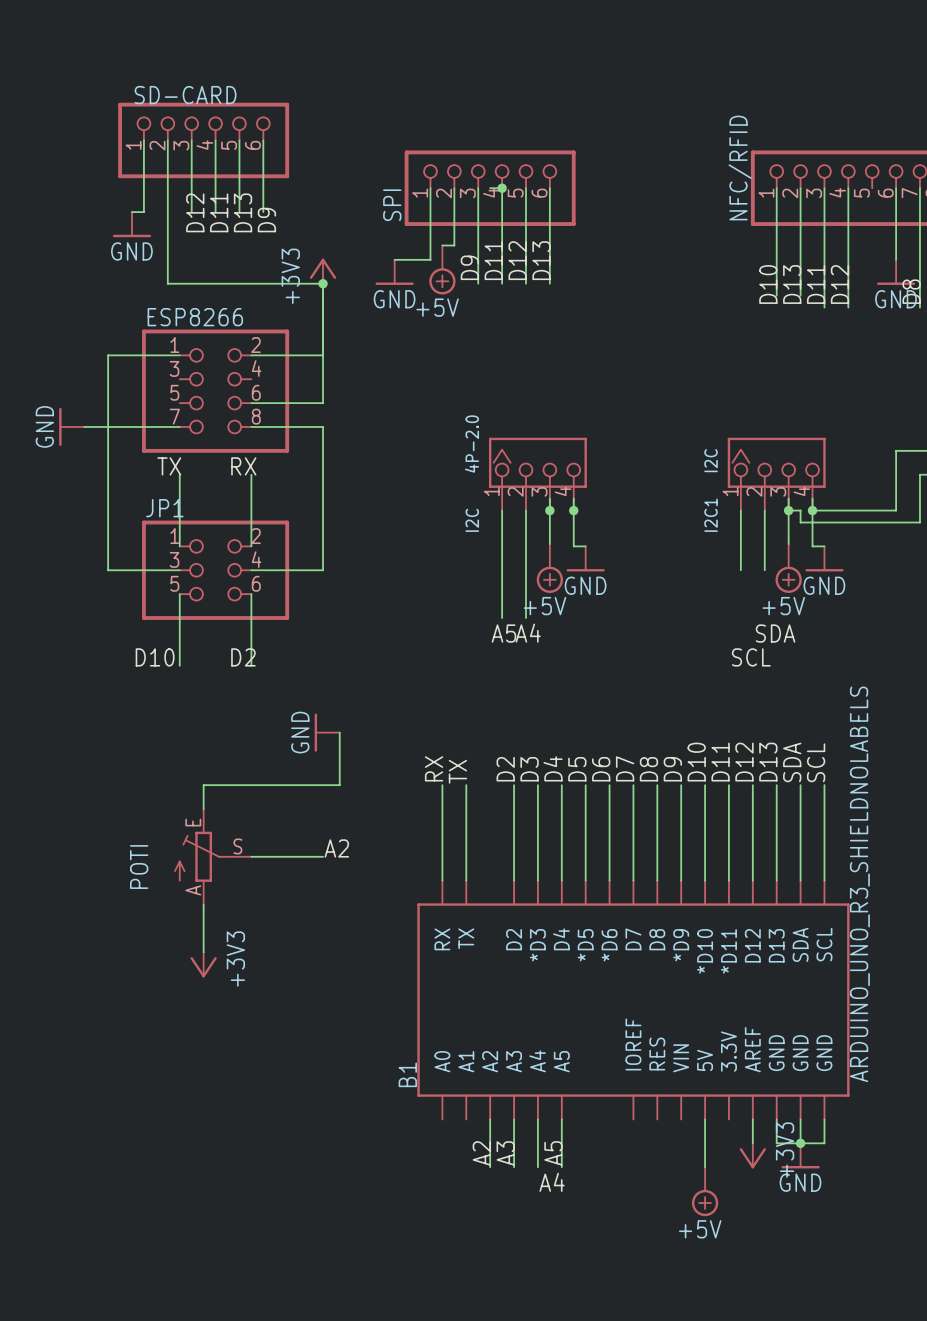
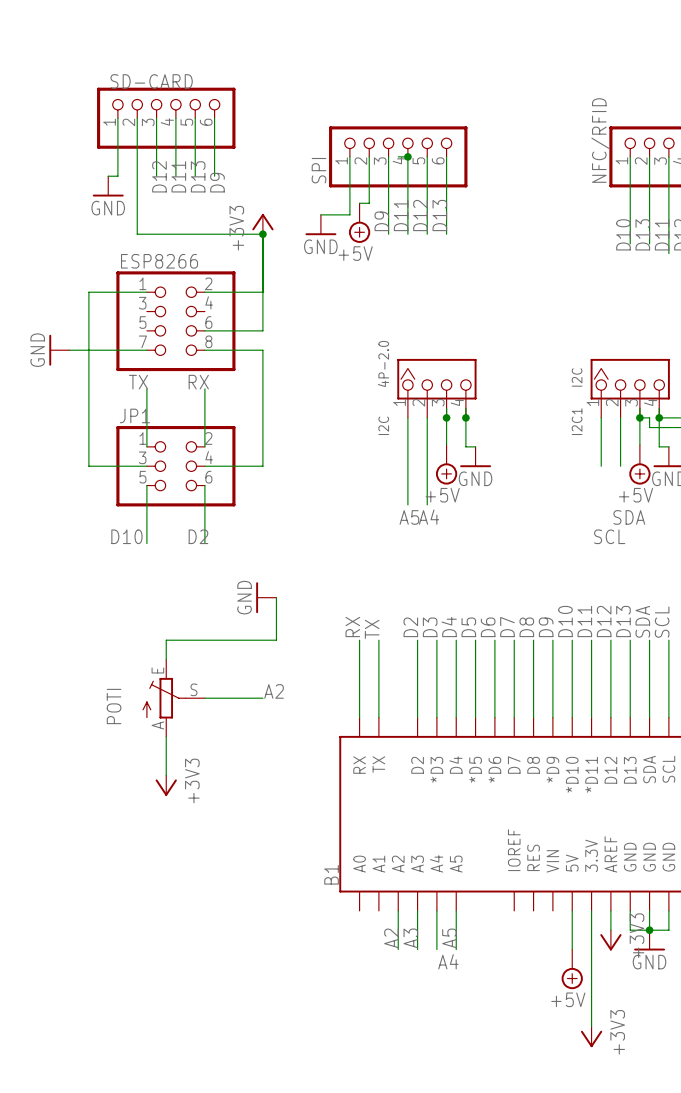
wire: none -> (591, 910) (591, 1026)
power symbol: none -> +3V3 (591, 1037)

